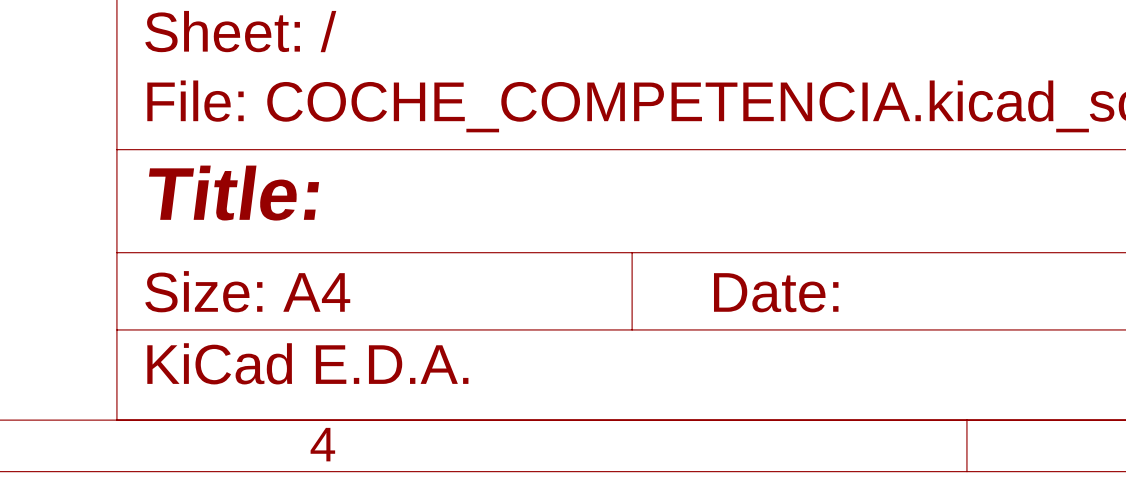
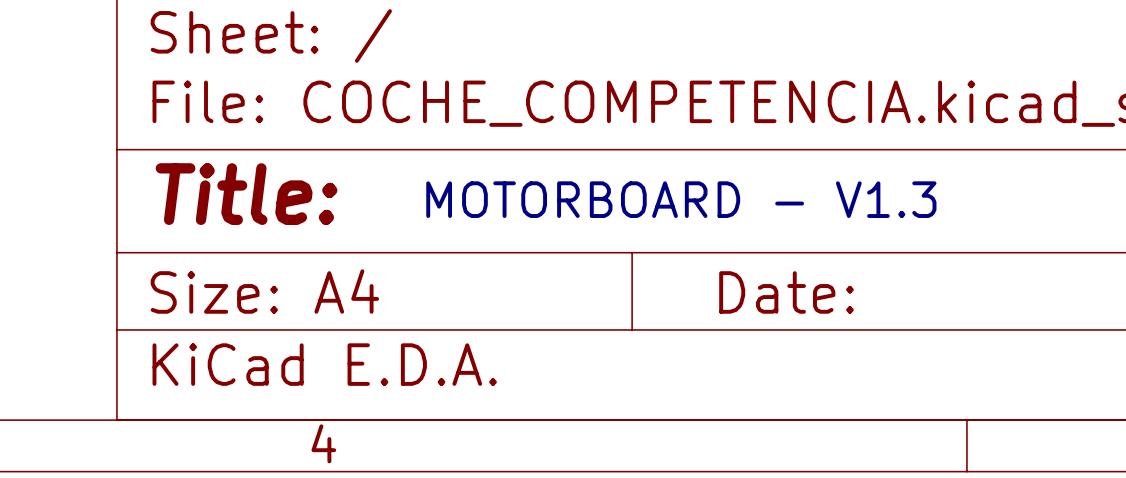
text: none -> MOTORBOARD - V1.3 (681, 199)

